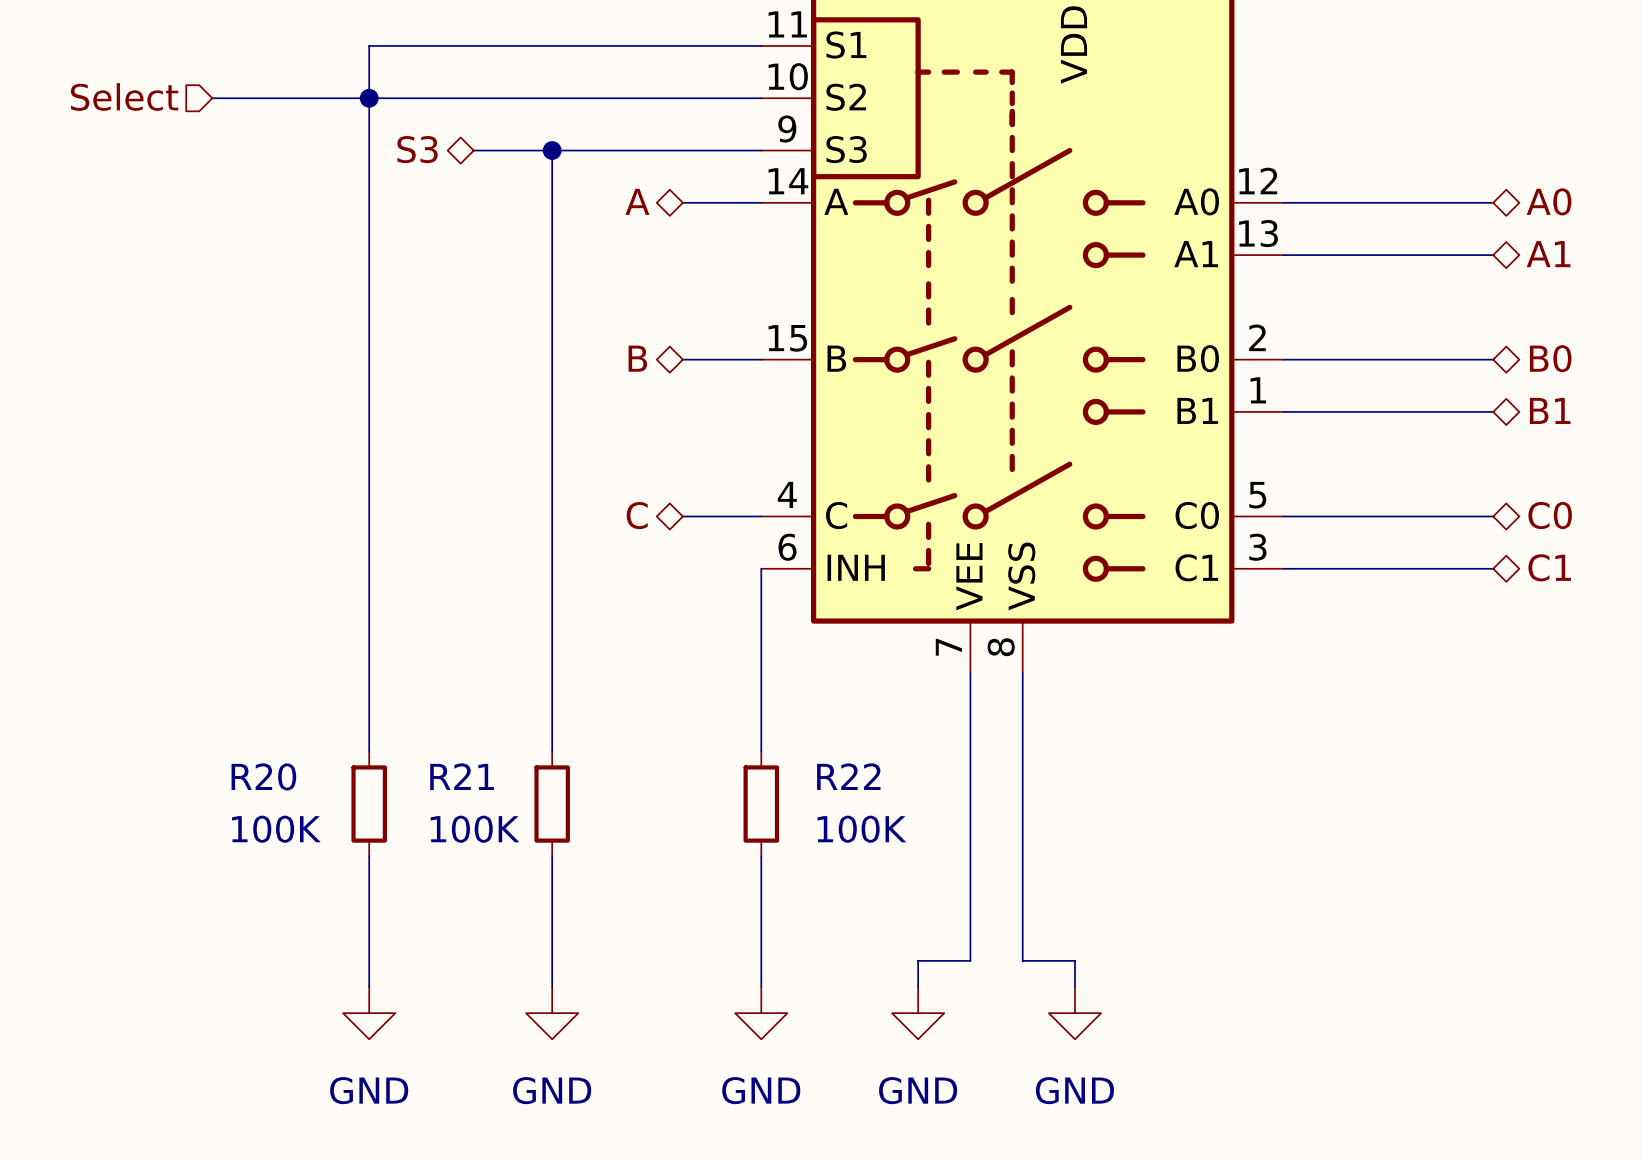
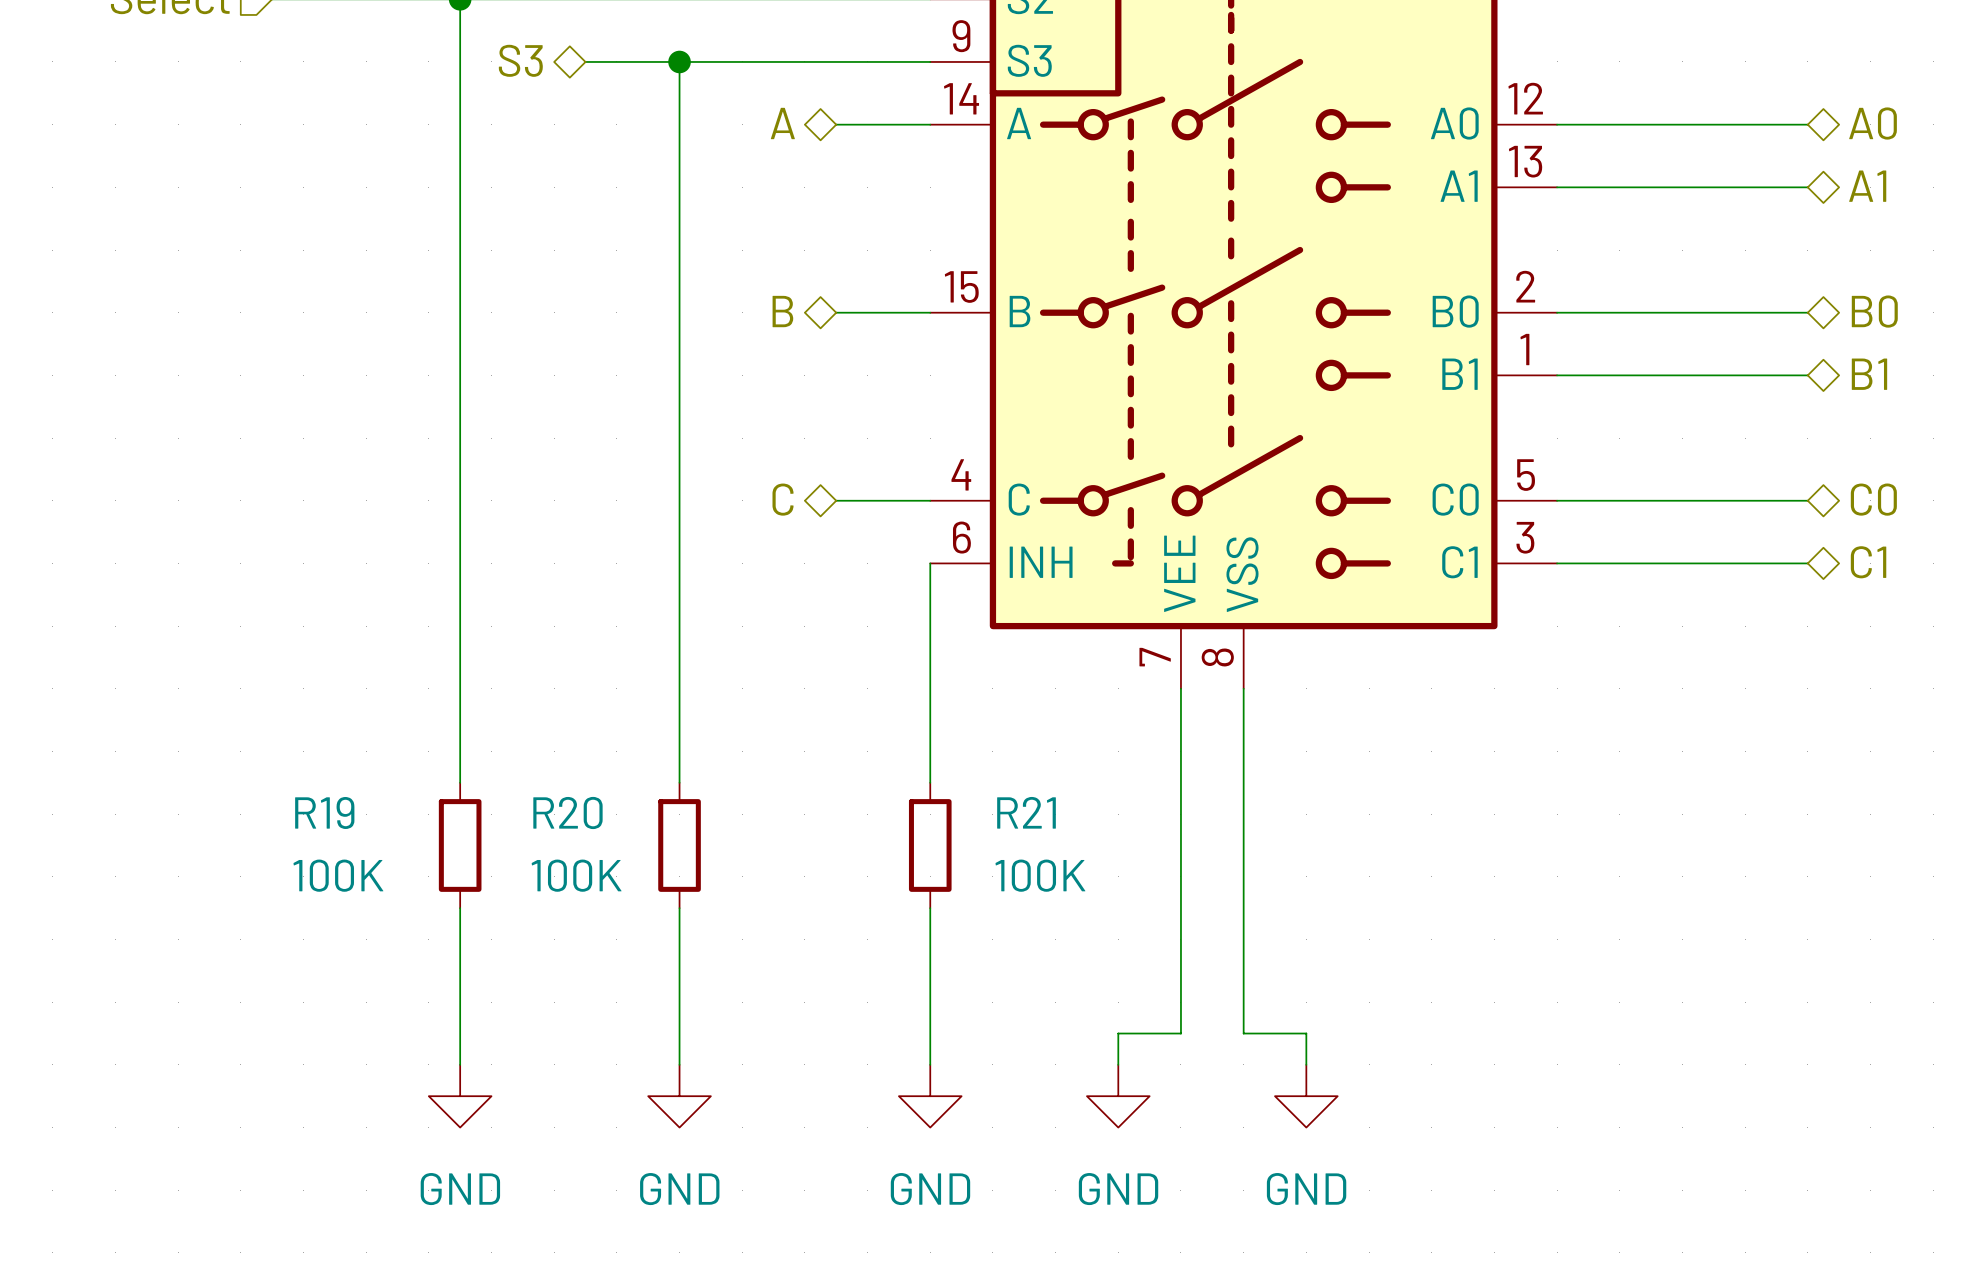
R20 name: R20 (263, 776) -> R19 (324, 812)
R21 name: R21 (462, 776) -> R20 (567, 812)
R22 name: R22 (848, 776) -> R21 (1026, 812)

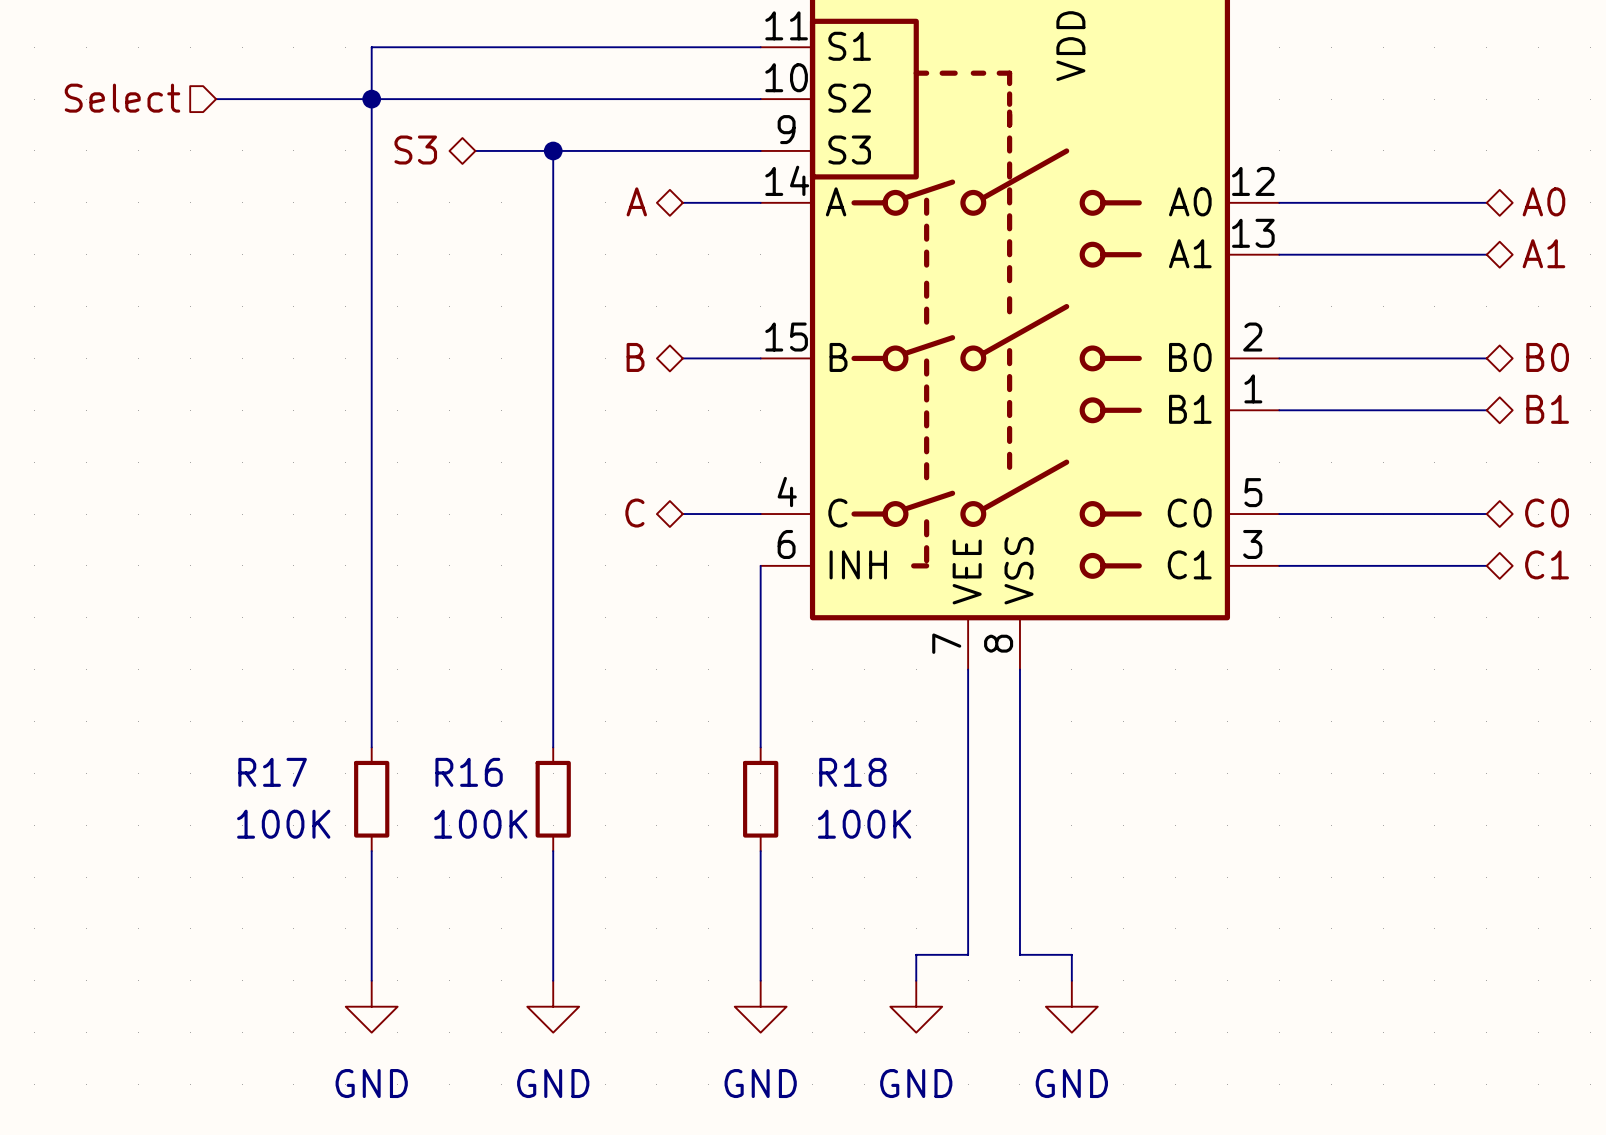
R19 name: R19 (324, 812) -> R17 (272, 772)
R20 name: R20 (567, 812) -> R16 (469, 772)
R21 name: R21 (1026, 812) -> R18 (852, 772)

